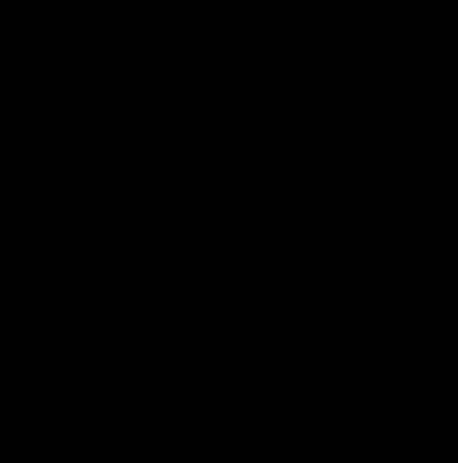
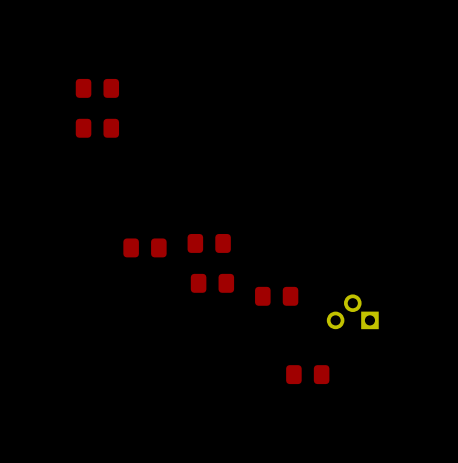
part: none -> (97, 88)
part: none -> (97, 128)
part: none -> (209, 243)
part: none -> (144, 247)
part: none -> (212, 283)
part: none -> (276, 296)
part: none -> (352, 311)
part: none -> (307, 374)

